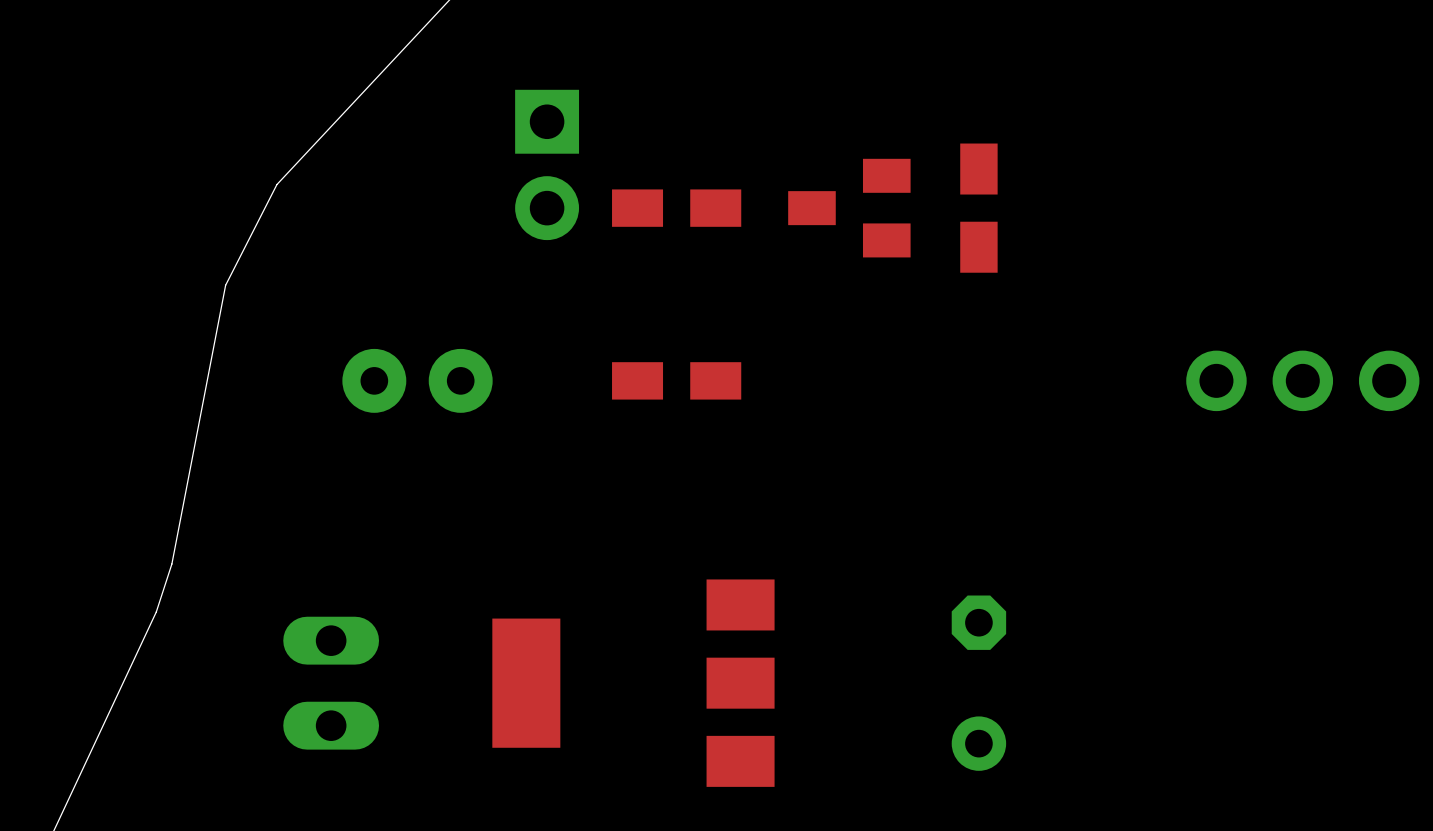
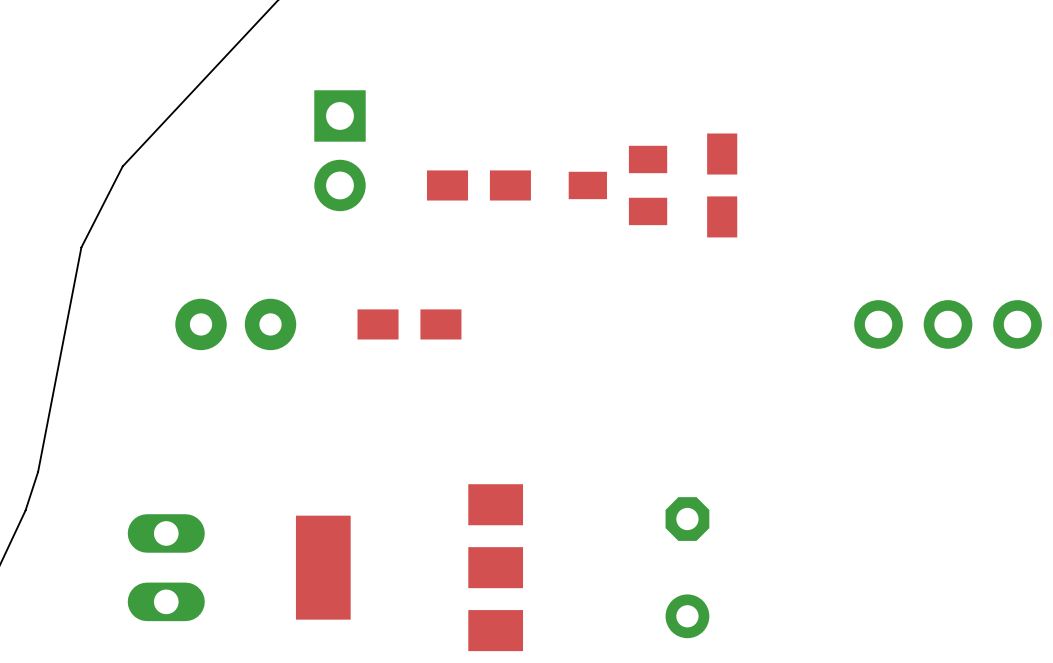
part position: (676, 208) -> (478, 185)
part position: (849, 208) -> (617, 185)
part position: (978, 208) -> (722, 185)
part position: (676, 380) -> (409, 324)

